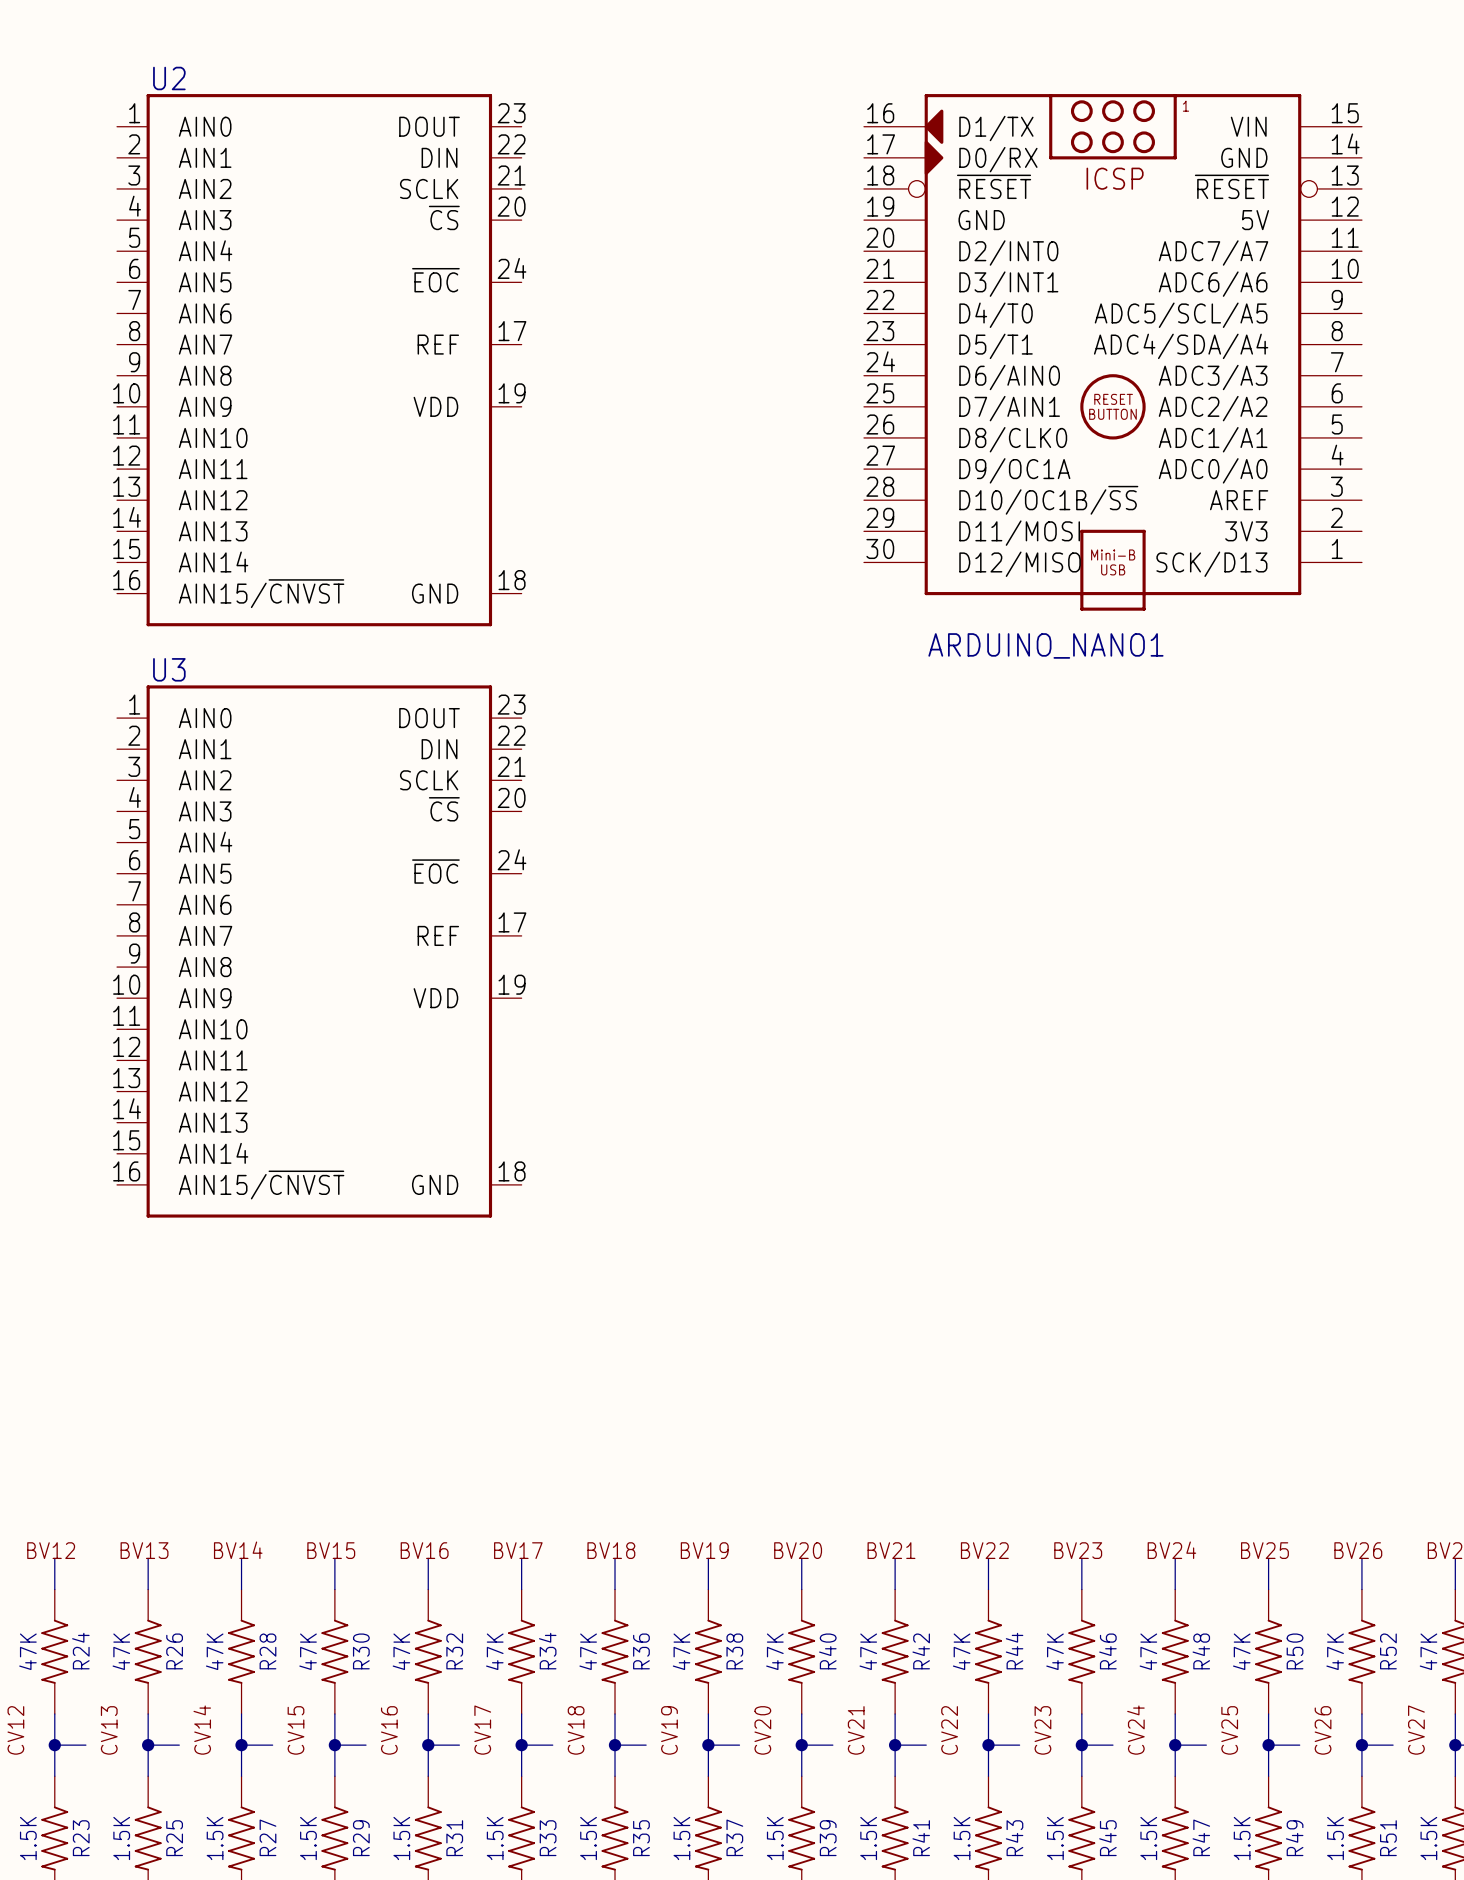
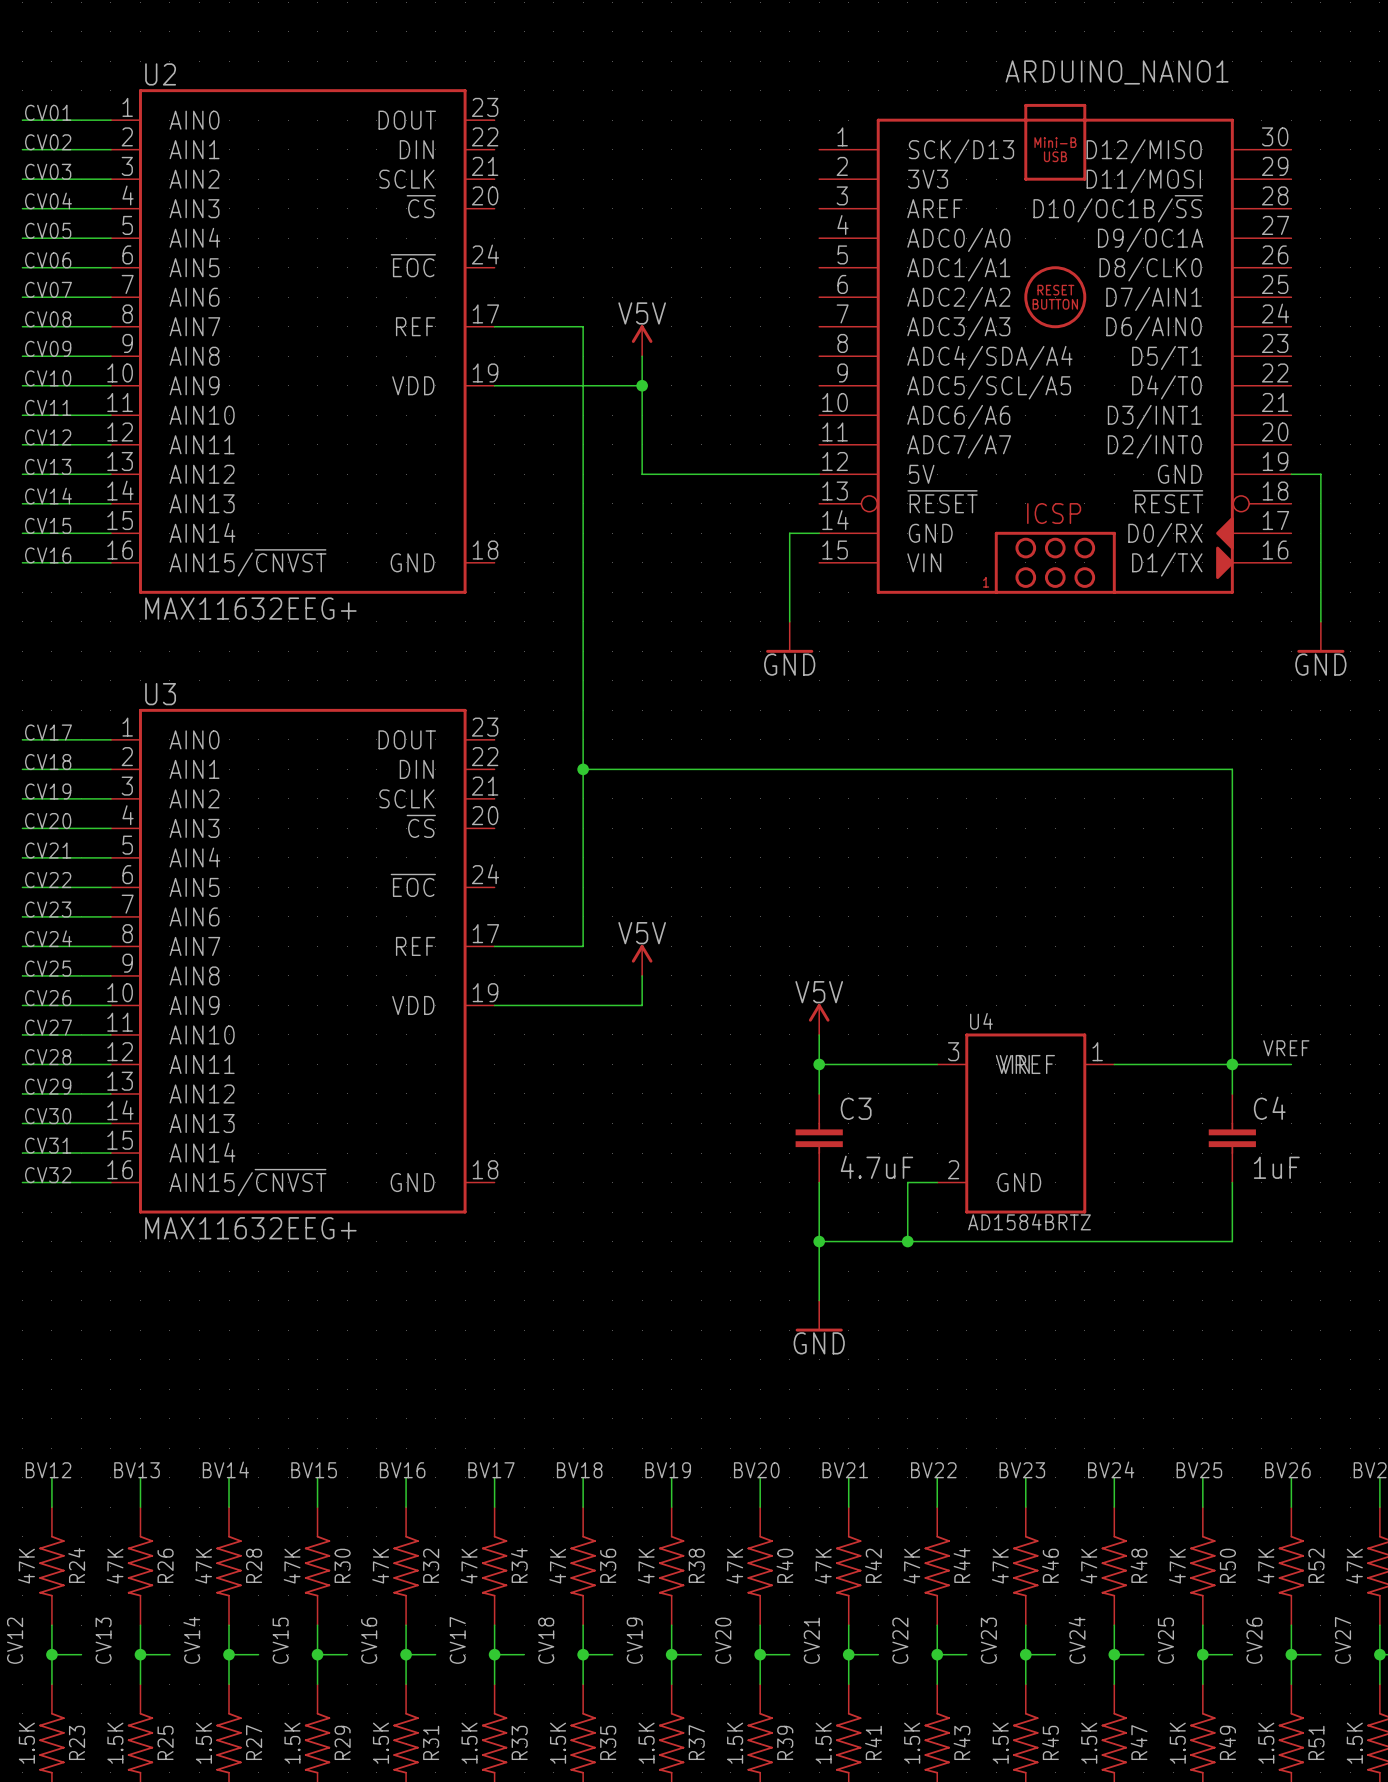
ARDUINO_NANO1 symbol: [863, 94, 1362, 611] -> [819, 103, 1292, 594]
label: none -> CV01 (48, 112)
wire: none -> (22, 120) (110, 120)
label: none -> CV02 (48, 142)
wire: none -> (22, 149) (110, 149)
label: none -> CV03 (48, 171)
wire: none -> (22, 179) (110, 179)
label: none -> CV04 (48, 200)
wire: none -> (22, 208) (110, 208)
label: none -> CV05 (48, 230)
wire: none -> (22, 238) (110, 238)
label: none -> CV06 (48, 260)
wire: none -> (22, 267) (110, 267)
label: none -> CV07 (48, 289)
wire: none -> (22, 297) (110, 297)
label: none -> CV08 (48, 319)
wire: none -> (22, 326) (110, 326)
wire: none -> (494, 326) (583, 326) (583, 946) (494, 946)
power symbol: none -> V5V (642, 340)
label: none -> CV09 (48, 348)
wire: none -> (22, 356) (110, 356)
wire: none -> (642, 356) (642, 474) (819, 474)
label: none -> CV10 (48, 378)
wire: none -> (22, 385) (110, 385)
wire: none -> (494, 385) (642, 385)
junction: none -> (642, 385)
label: none -> CV11 (48, 407)
wire: none -> (22, 415) (110, 415)
label: none -> CV12 (48, 437)
wire: none -> (22, 444) (110, 444)
label: none -> CV13 (48, 466)
wire: none -> (22, 474) (110, 474)
wire: none -> (1291, 474) (1320, 474) (1320, 621)
label: none -> CV14 (48, 496)
wire: none -> (22, 503) (110, 503)
label: none -> CV15 (48, 525)
wire: none -> (22, 533) (110, 533)
wire: none -> (819, 533) (789, 533) (789, 621)
label: none -> CV16 (48, 555)
wire: none -> (22, 562) (110, 562)
U2 value: none -> MAX11632EEG+ (250, 608)
ARDUINO_NANO1 name position: ARDUINO_NANO1 (1045, 645) -> ARDUINO_NANO1 (1117, 72)
power symbol: none -> GND (789, 637)
power symbol: none -> GND (1320, 637)
label: none -> CV17 (48, 732)
wire: none -> (22, 739) (110, 739)
label: none -> CV18 (48, 762)
wire: none -> (22, 769) (110, 769)
wire: none -> (583, 769) (1232, 769) (1232, 1093)
junction: none -> (583, 769)
label: none -> CV19 (48, 791)
wire: none -> (22, 798) (110, 798)
label: none -> CV20 (48, 821)
wire: none -> (22, 828) (110, 828)
label: none -> CV21 (48, 850)
wire: none -> (22, 857) (110, 857)
label: none -> CV22 (48, 880)
wire: none -> (22, 887) (110, 887)
U3 position: (319, 951) -> (302, 961)
label: none -> CV23 (48, 909)
wire: none -> (22, 916) (110, 916)
label: none -> CV24 (48, 938)
wire: none -> (22, 946) (110, 946)
power symbol: none -> V5V (642, 960)
label: none -> CV25 (48, 968)
wire: none -> (22, 975) (110, 975)
wire: none -> (642, 975) (642, 1005) (494, 1005)
label: none -> CV26 (48, 998)
wire: none -> (22, 1005) (110, 1005)
power symbol: none -> V5V (819, 1019)
label: none -> CV27 (48, 1027)
wire: none -> (22, 1034) (110, 1034)
wire: none -> (819, 1034) (819, 1093)
label: none -> VREF (1286, 1048)
label: none -> CV28 (48, 1057)
wire: none -> (22, 1064) (110, 1064)
wire: none -> (819, 1064) (937, 1064)
junction: none -> (819, 1064)
wire: none -> (1114, 1064) (1291, 1064)
junction: none -> (1232, 1064)
label: none -> CV29 (48, 1086)
wire: none -> (22, 1093) (110, 1093)
label: none -> CV30 (48, 1116)
wire: none -> (22, 1123) (110, 1123)
U4: none -> AD1584BRTZ (1025, 1123)
C3: none -> 4.7uF (819, 1138)
C4: none -> 1uF (1232, 1138)
label: none -> CV31 (48, 1145)
wire: none -> (22, 1153) (110, 1153)
label: none -> CV32 (48, 1175)
wire: none -> (22, 1182) (110, 1182)
wire: none -> (819, 1182) (819, 1300)
wire: none -> (937, 1182) (907, 1182) (907, 1241)
wire: none -> (1232, 1182) (1232, 1241) (819, 1241)
U3 value: none -> MAX11632EEG+ (250, 1228)
junction: none -> (819, 1241)
junction: none -> (907, 1241)
power symbol: none -> GND (819, 1316)

